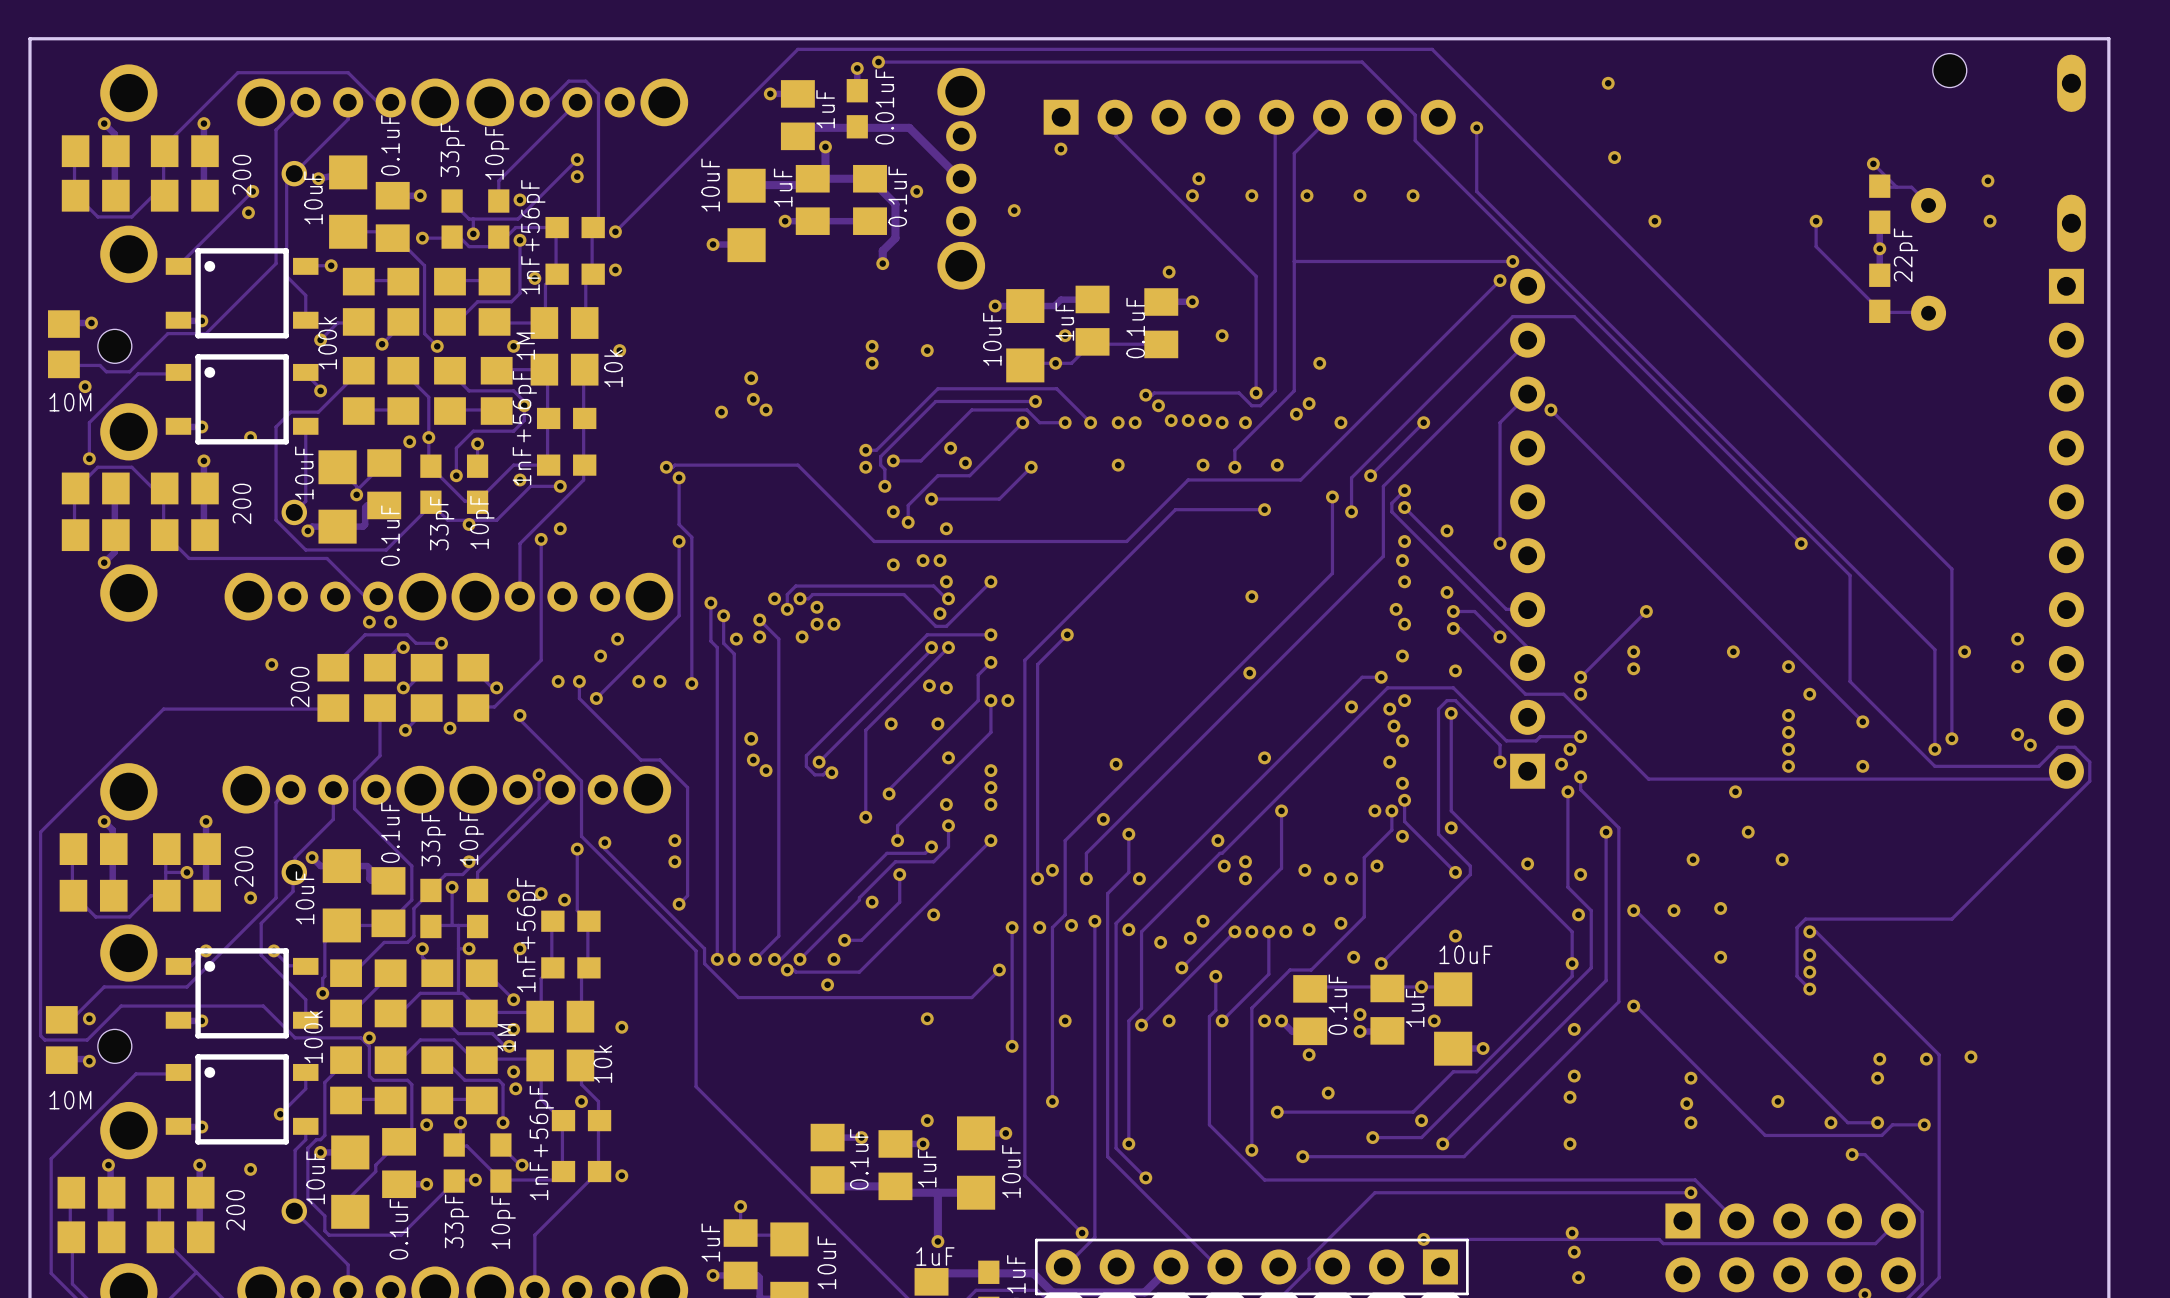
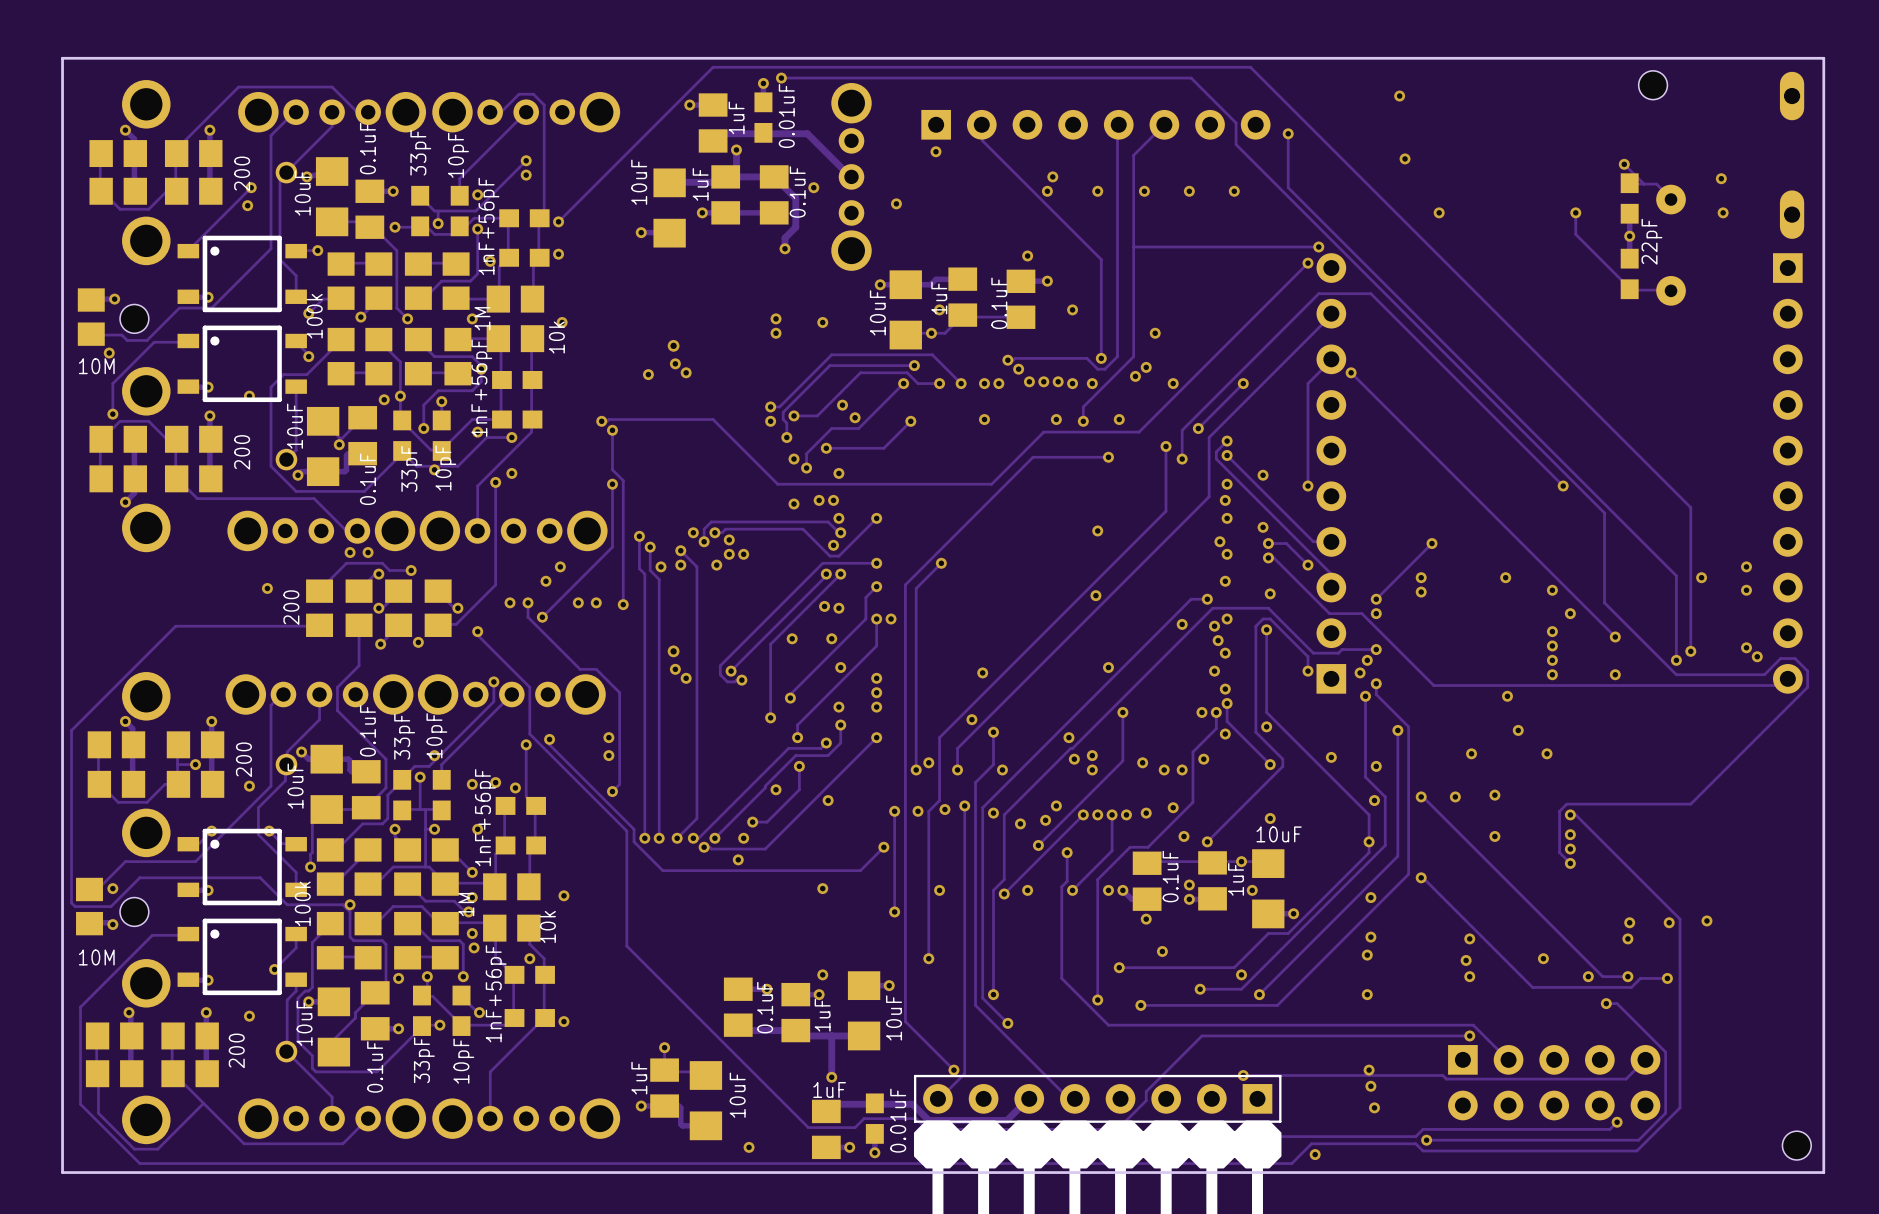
hole position: (1949, 70) -> (1653, 85)

